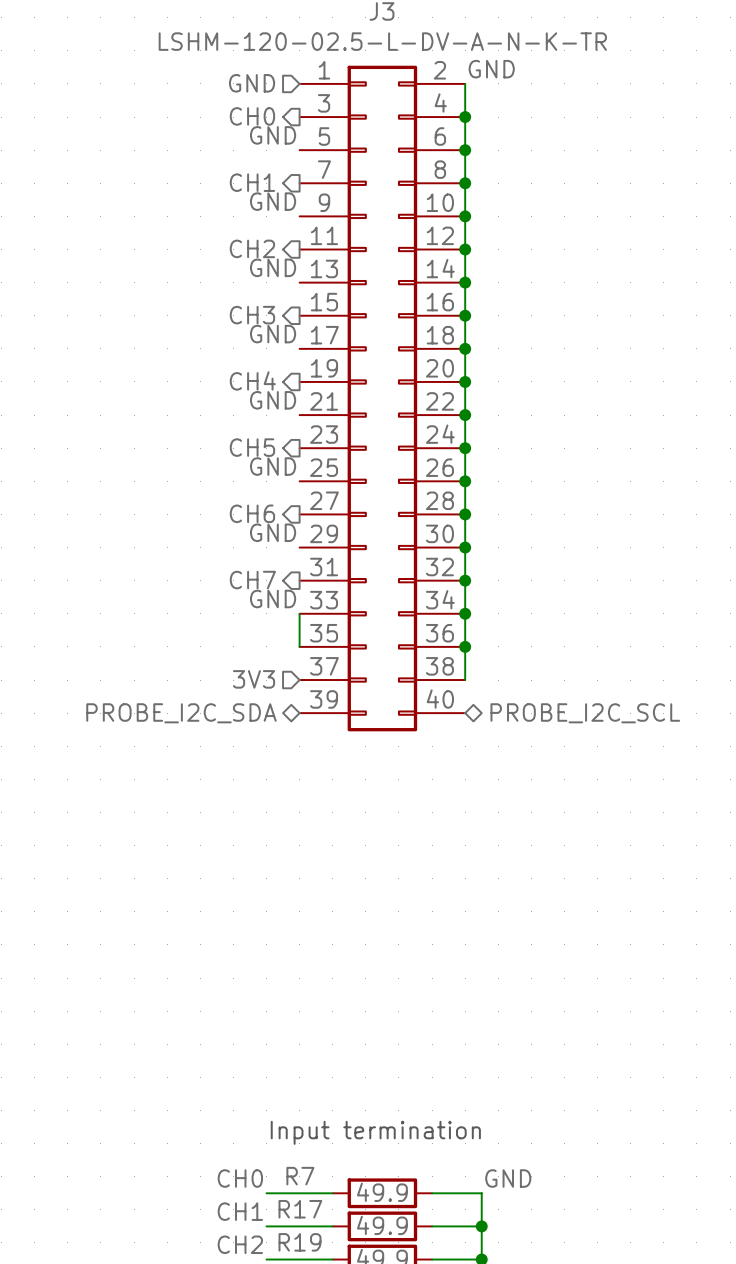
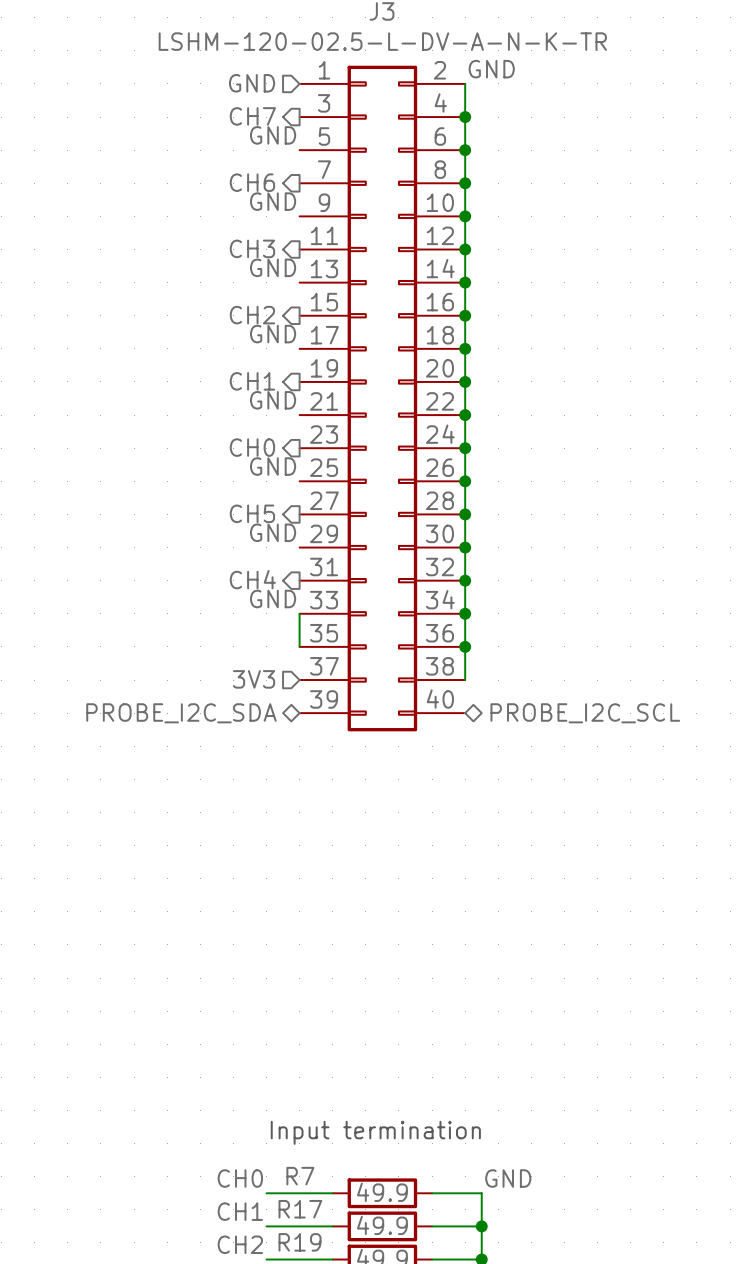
hierarchical label: CH0 (252, 116) -> CH7 (252, 116)
hierarchical label: CH1 (252, 182) -> CH6 (252, 182)
hierarchical label: CH2 (252, 248) -> CH3 (252, 248)
hierarchical label: CH3 (252, 315) -> CH2 (252, 315)
hierarchical label: CH4 (252, 380) -> CH1 (252, 381)
hierarchical label: CH5 (252, 447) -> CH0 (252, 447)
hierarchical label: CH6 (252, 513) -> CH5 (252, 513)
hierarchical label: CH7 (252, 580) -> CH4 (252, 579)

